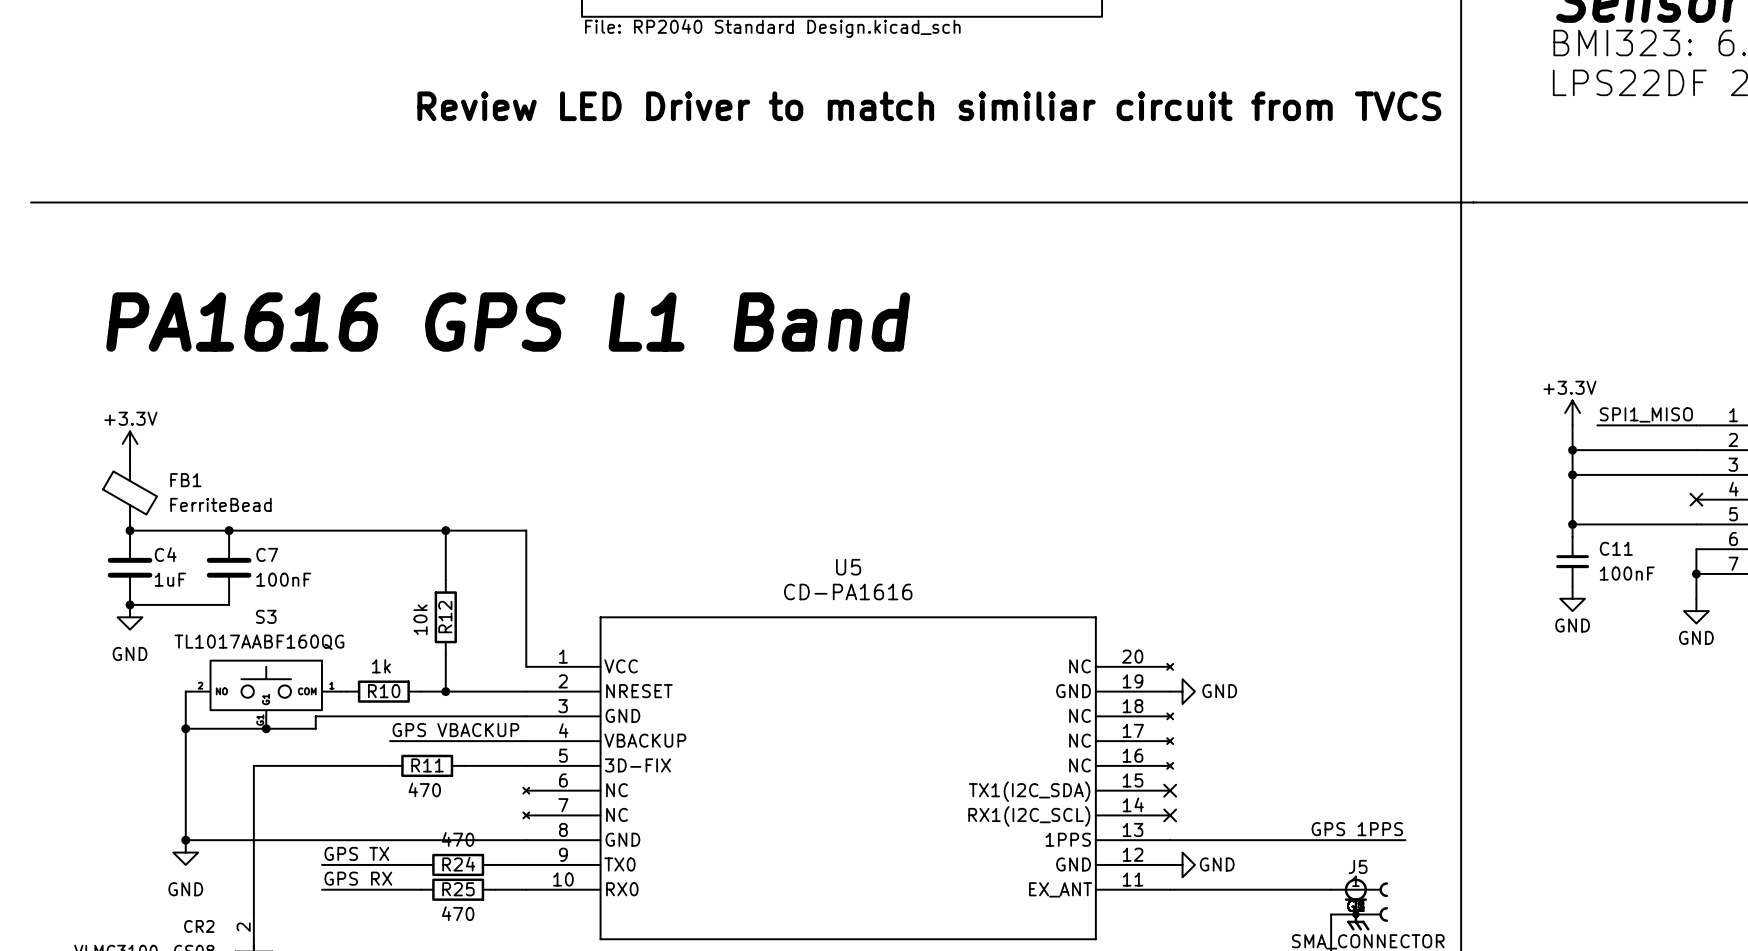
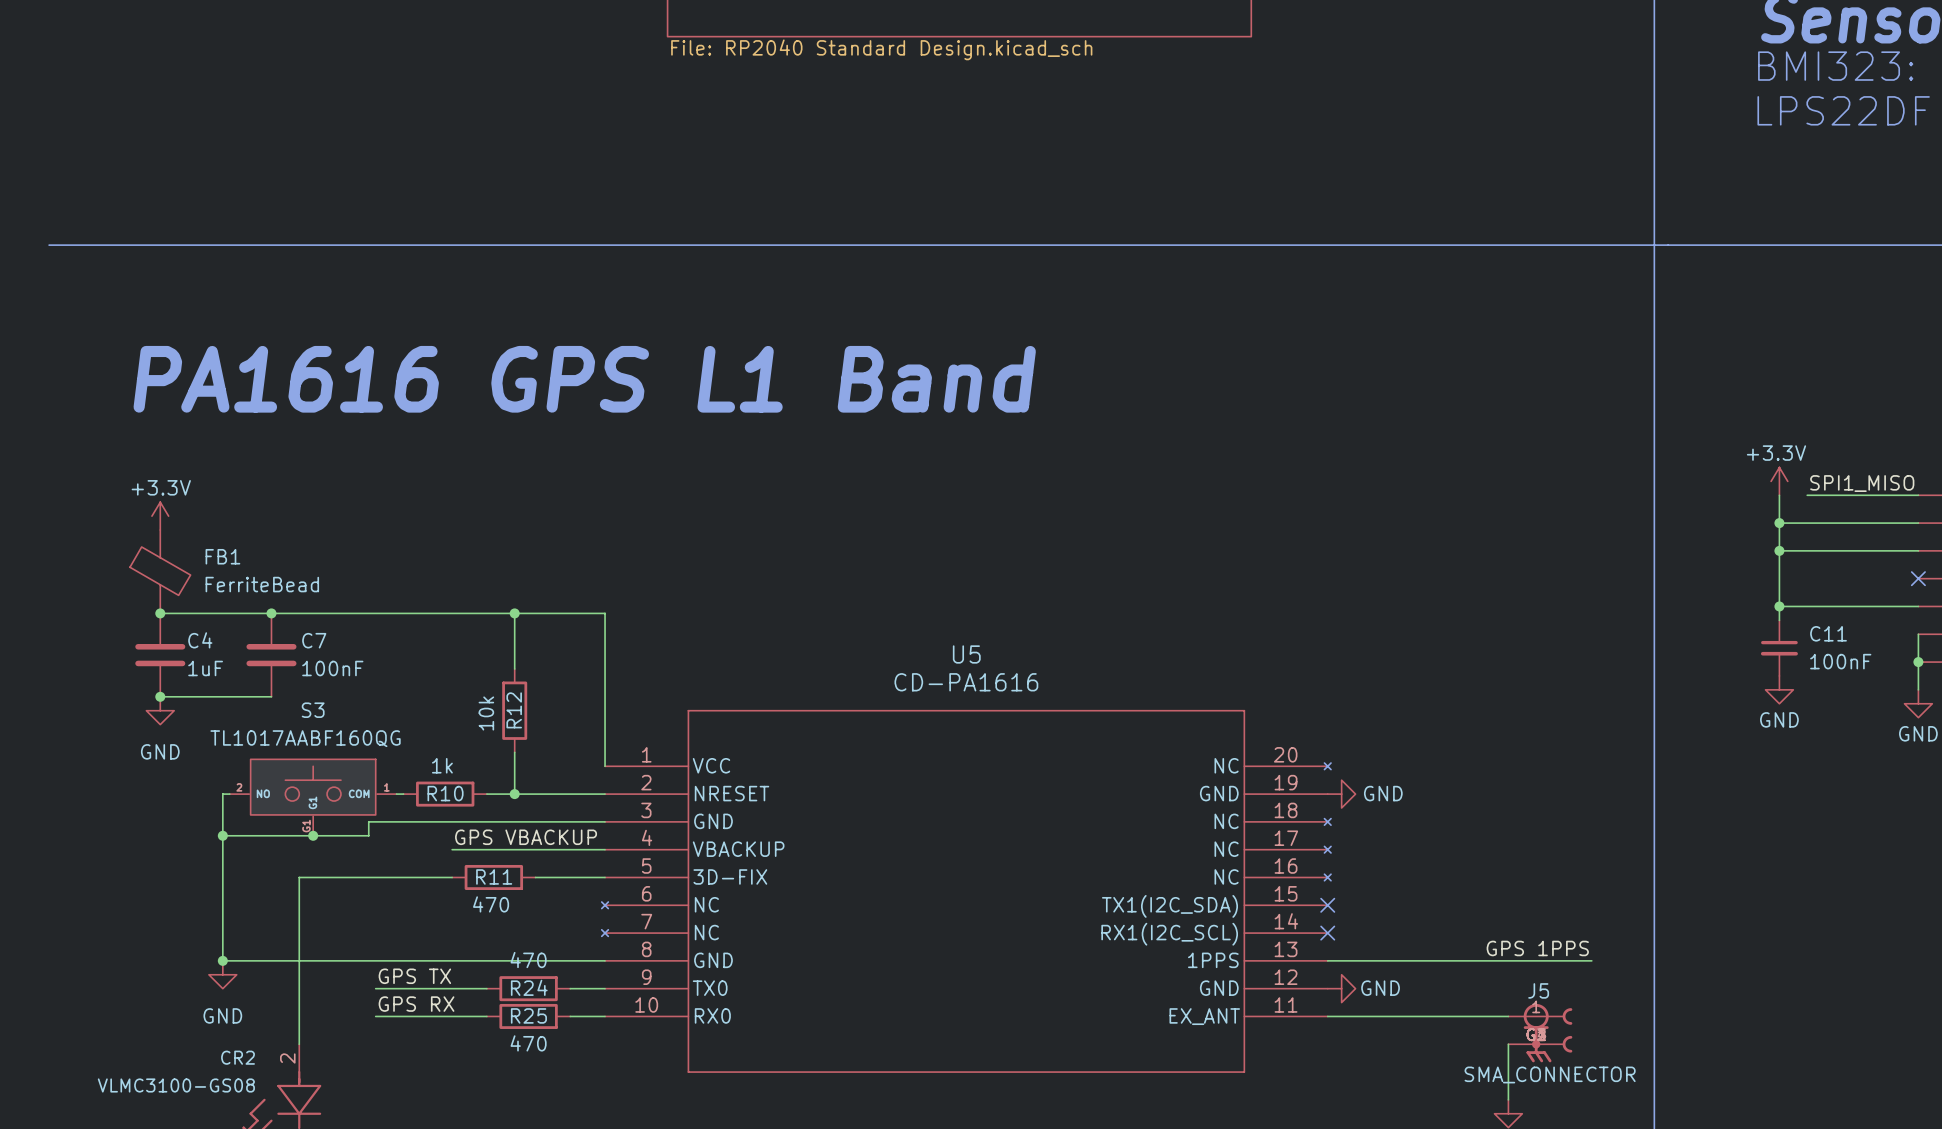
text: Review LED Driver to match similiar circuit from TVCS (929, 106) -> none

